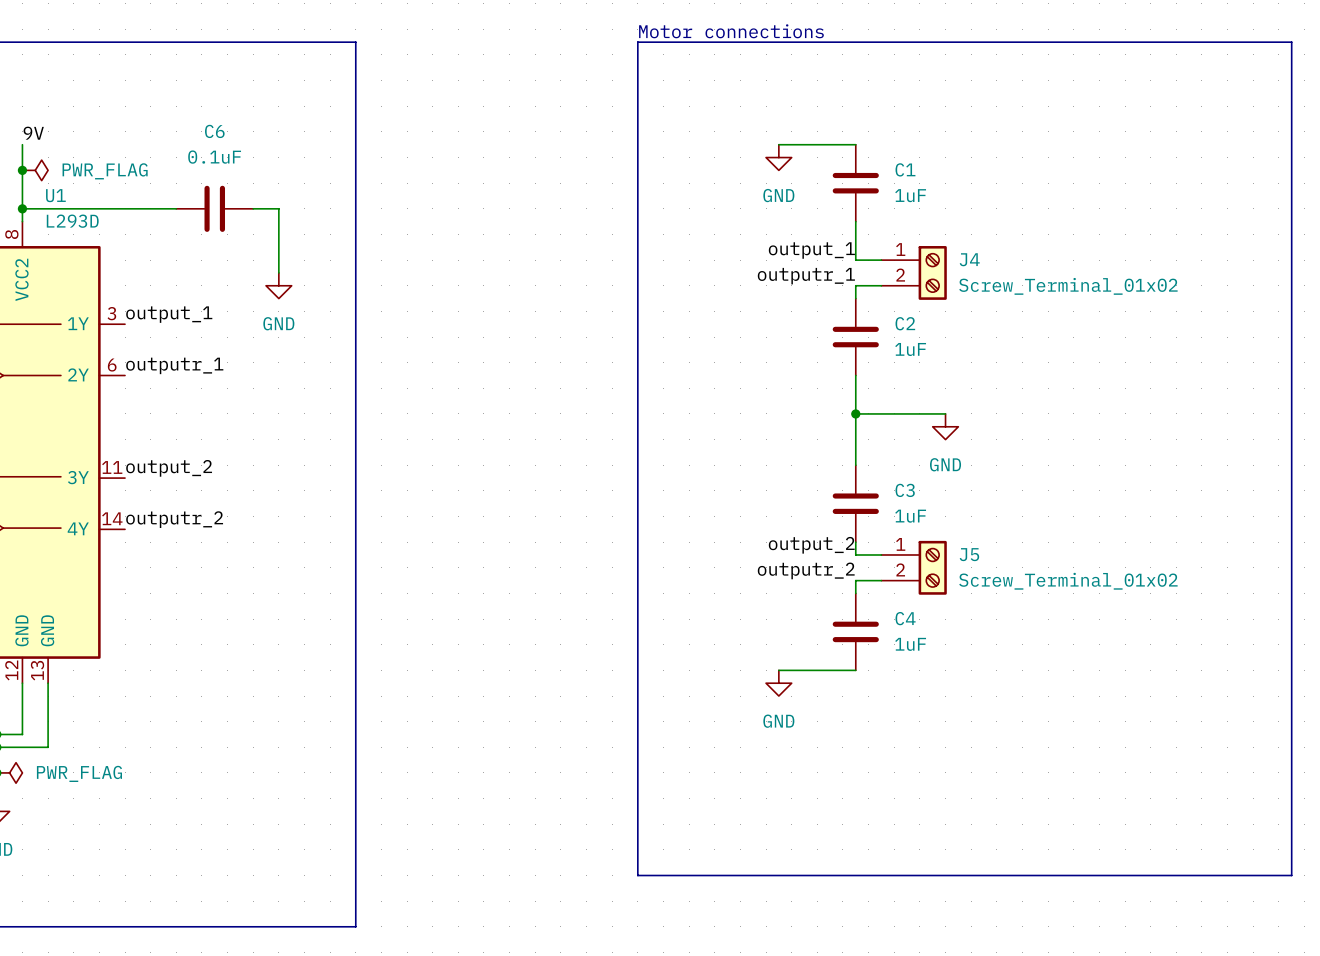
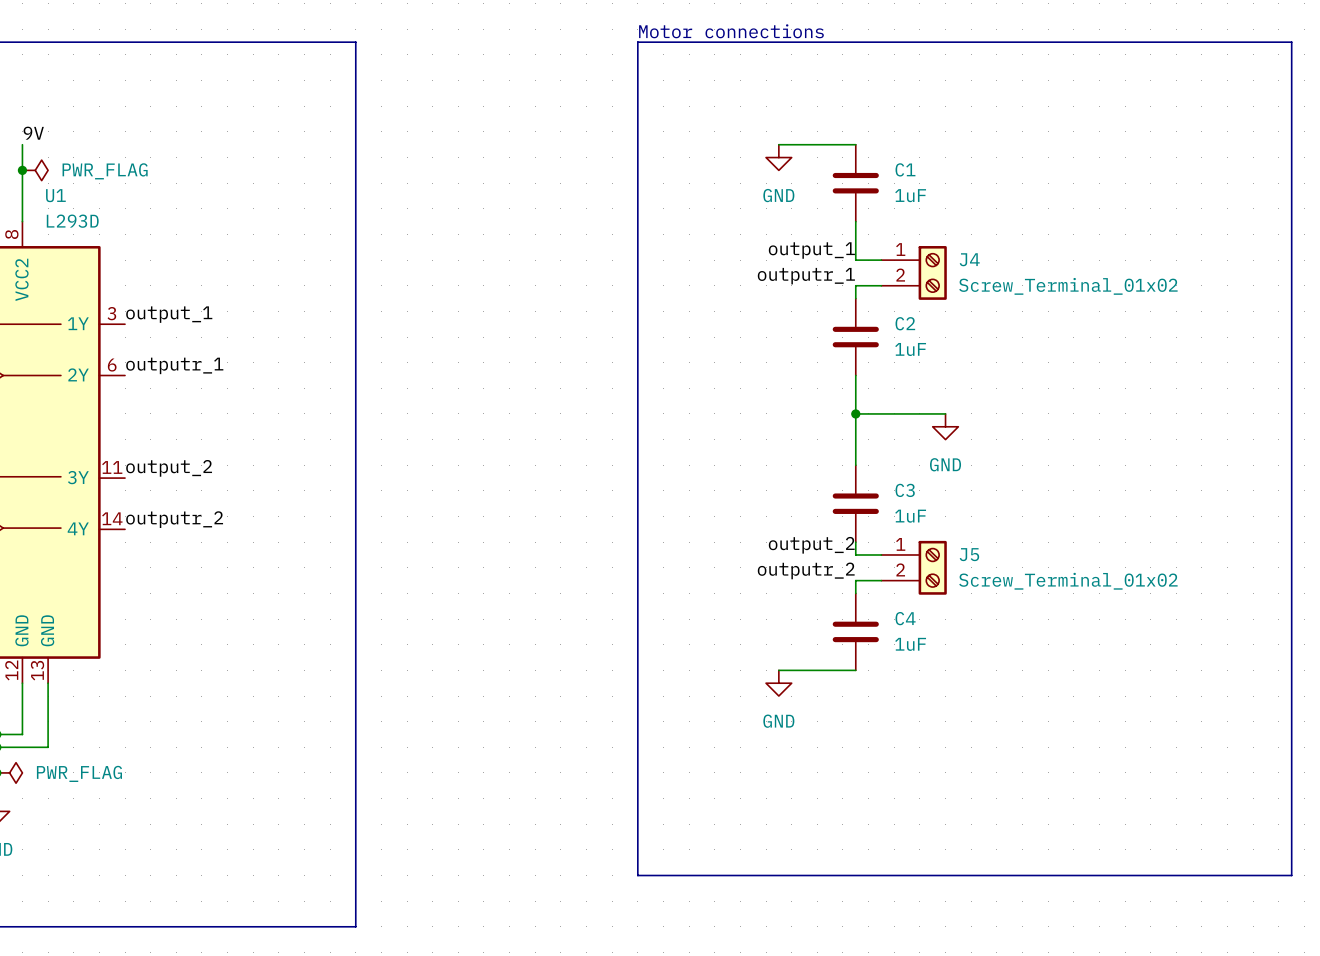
wire: (22, 208) (176, 208) -> none
junction: (22, 208) -> none
C6: 0.1uF (214, 208) -> none
wire: (253, 208) (278, 208) (278, 272) -> none
power symbol: GND (278, 285) -> none

